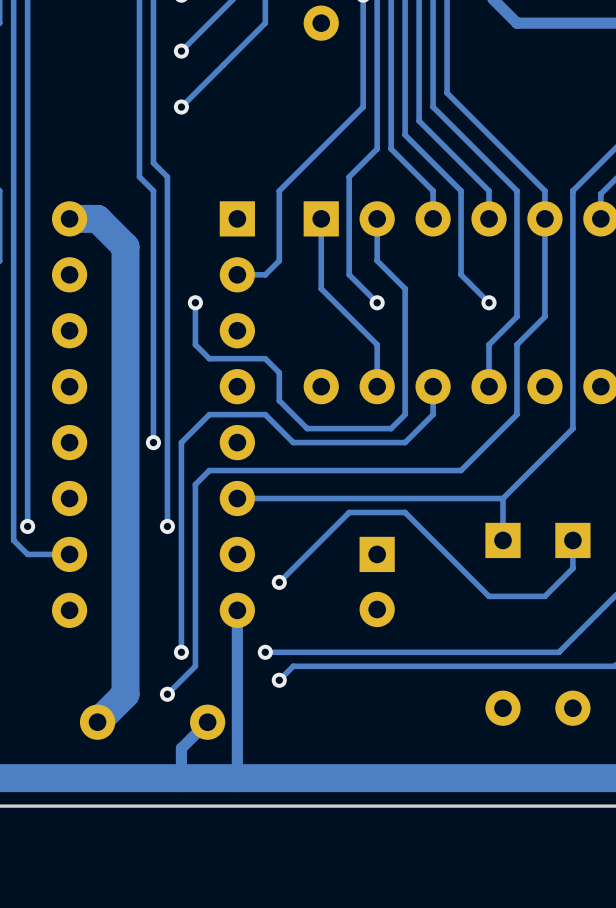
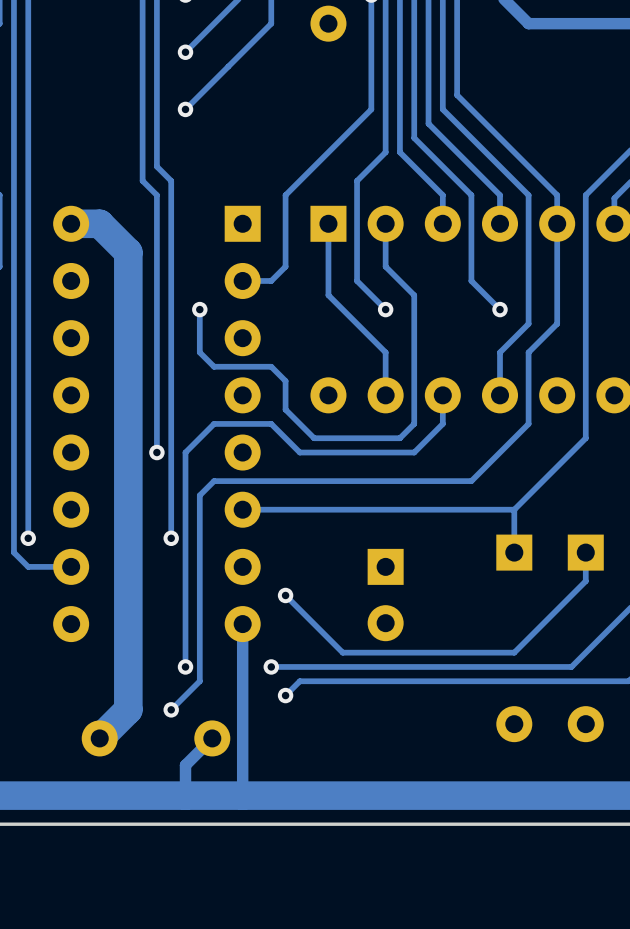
track: (279, 582) (349, 512) (405, 512) (489, 596) (544, 596) -> (285, 595) (342, 652) (514, 652) (557, 609)

